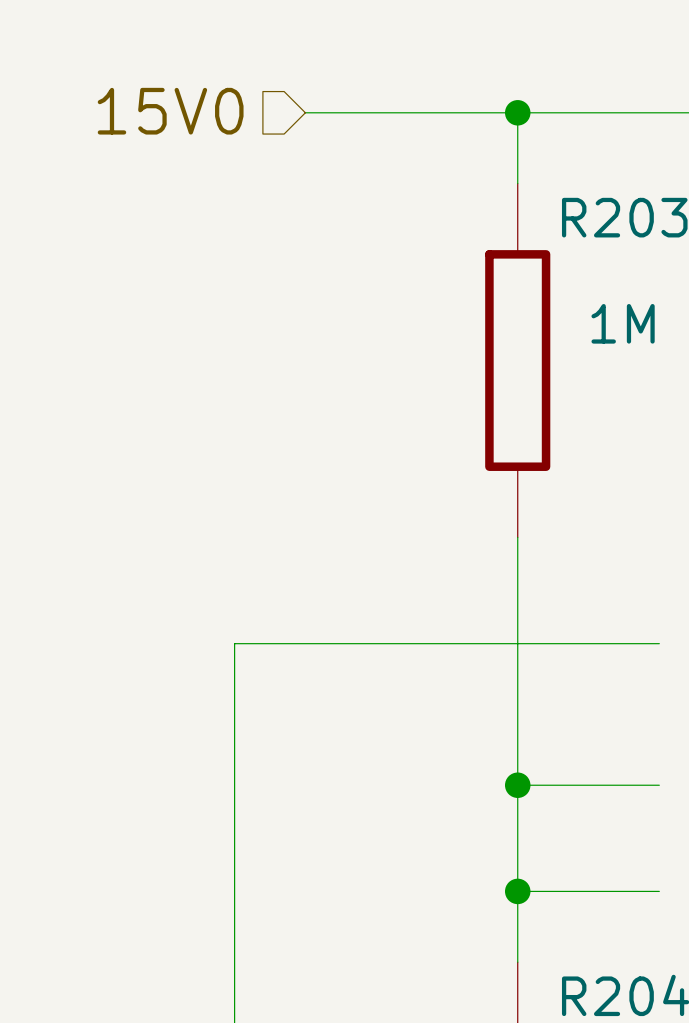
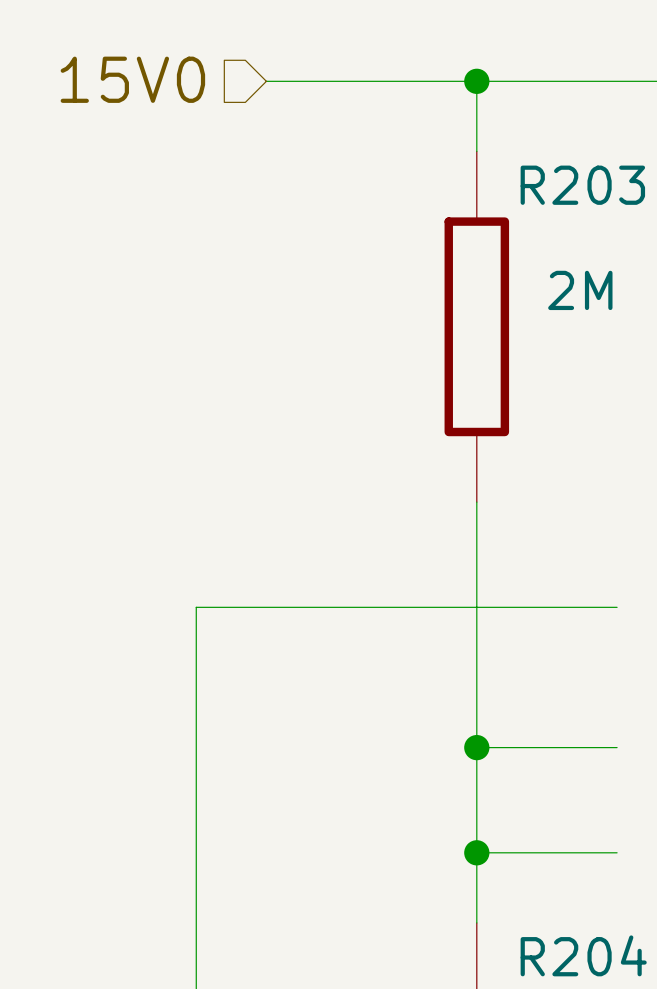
R203 value: 1M (623, 323) -> 2M (580, 290)

